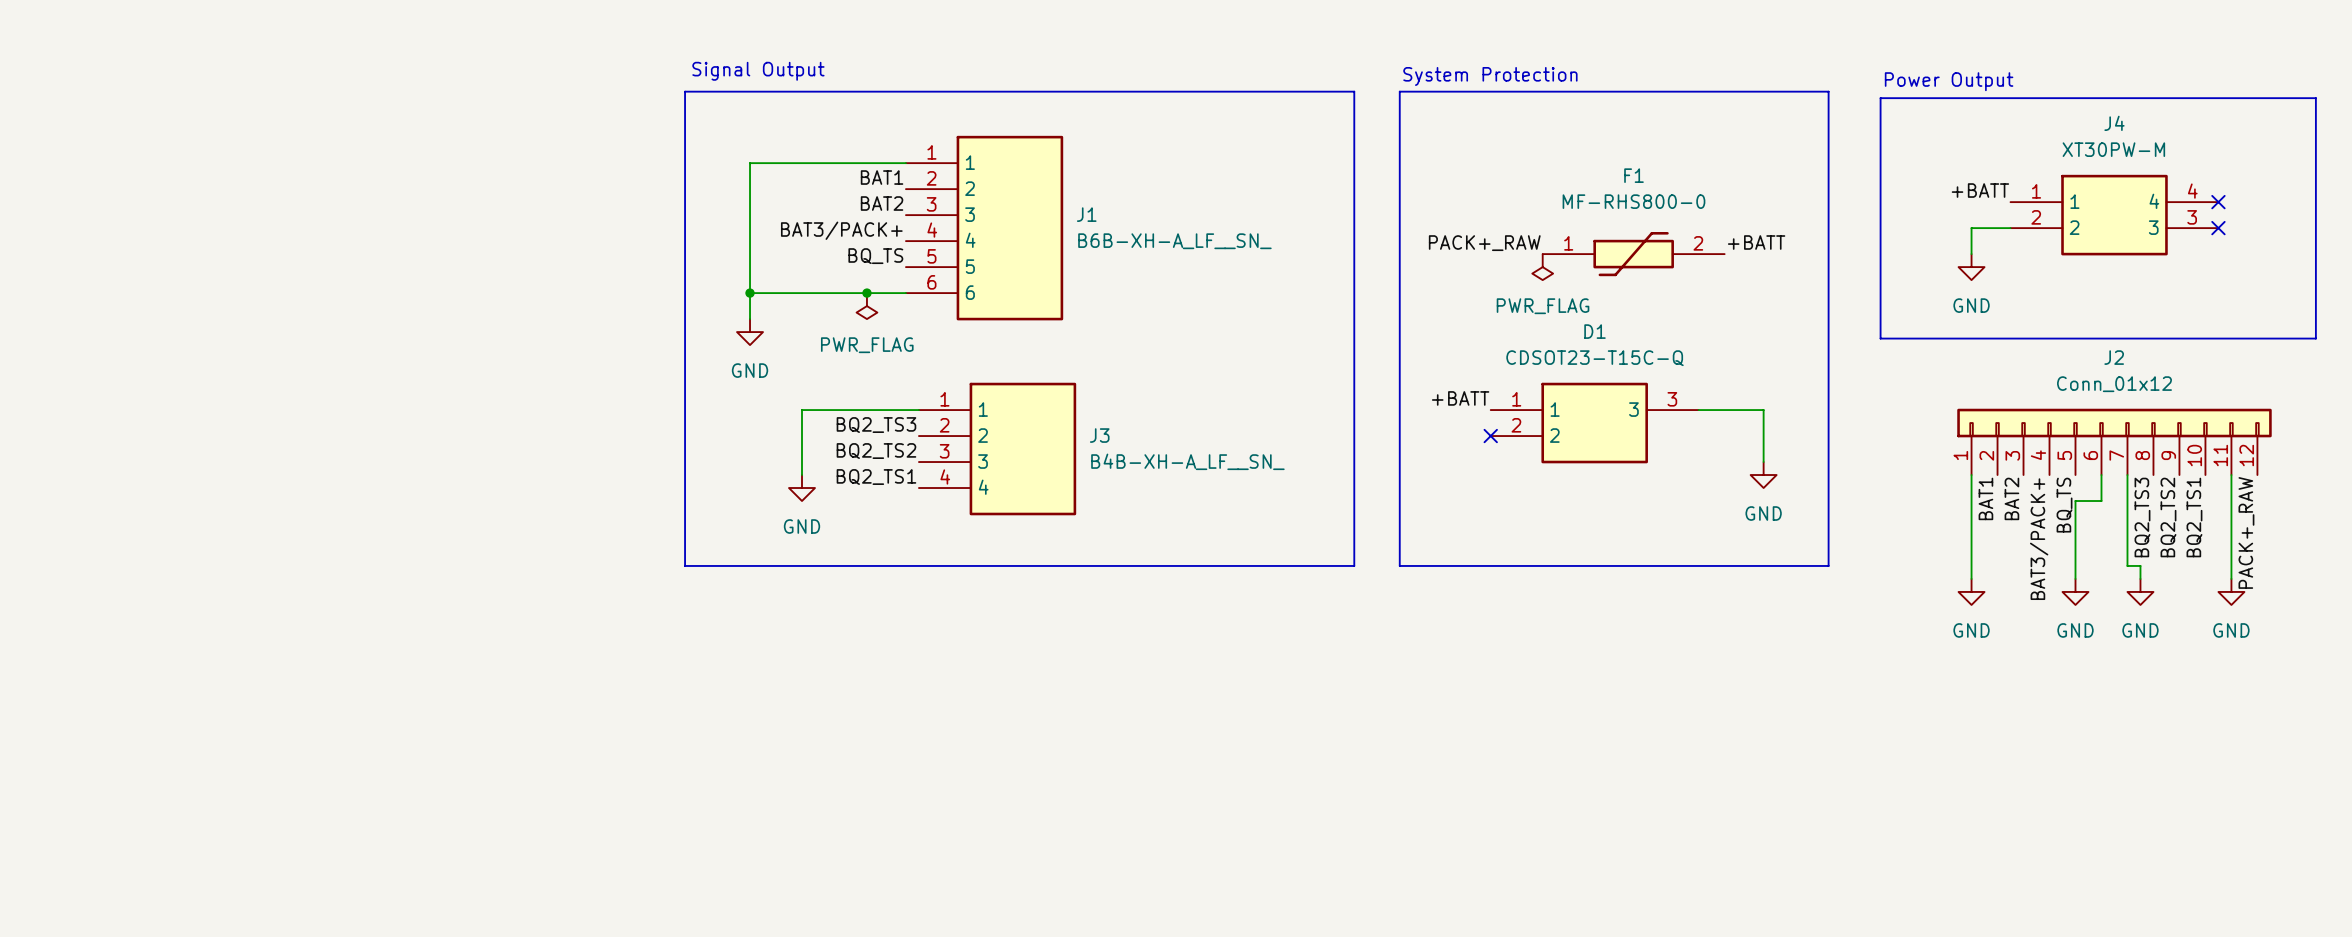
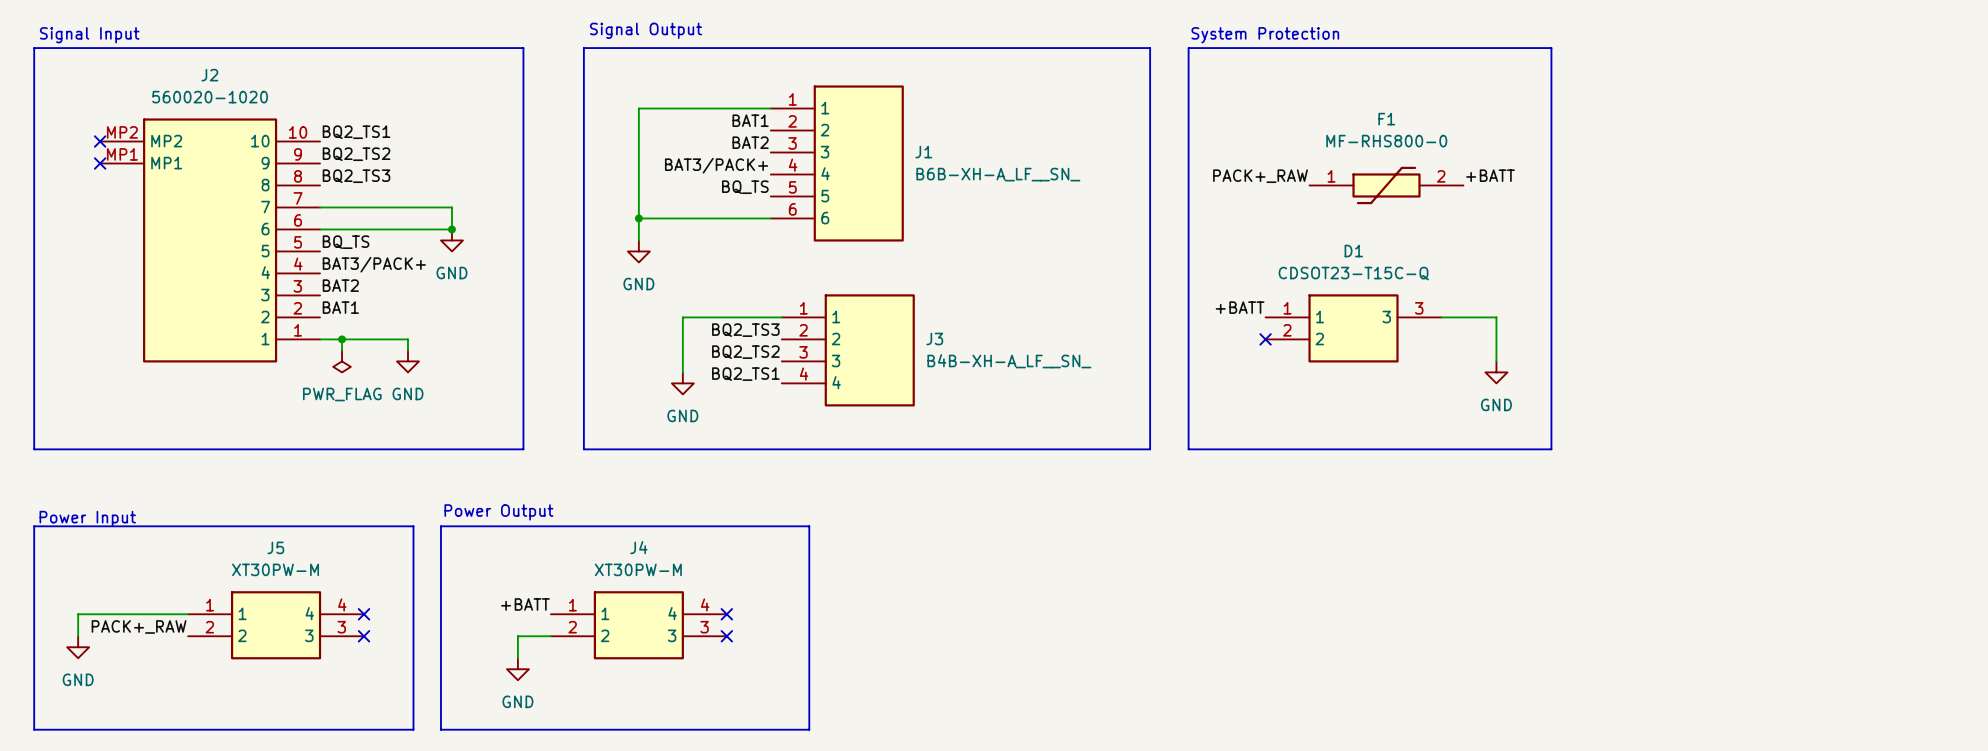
text: none -> Signal Input (89, 35)
text: Power Output (1949, 81) -> none
line: none -> (34, 48) (34, 449) (523, 449) (523, 48) (34, 48)
line: (1880, 98) (2315, 98) (2315, 338) (1880, 338) (1880, 98) -> none
label: +BATT (1980, 190) -> none
label: none -> BQ2_TS1 (356, 132)
no-connect mark: none -> (100, 141)
no-connect mark: (2218, 202) -> none
J4 position: (2114, 215) -> (638, 625)
label: none -> BQ2_TS2 (356, 154)
no-connect mark: none -> (100, 163)
wire: (2010, 228) (1971, 228) (1971, 254) -> none
no-connect mark: (2218, 228) -> none
label: none -> BQ2_TS3 (356, 176)
power symbol: PWR_FLAG (1542, 267) -> none
power symbol: GND (1971, 267) -> none
wire: none -> (320, 207) (451, 207) (451, 229) (320, 229)
junction: (866, 293) -> none
junction: none -> (451, 229)
power symbol: PWR_FLAG (866, 306) -> none
power symbol: none -> GND (451, 240)
label: none -> BQ_TS (346, 242)
label: none -> BAT3/PACK+ (374, 264)
J2 name position: J2 (2114, 357) -> J2 (209, 75)
label: none -> BAT2 (340, 285)
J2 value: Conn_01x12 (2114, 384) -> 560020-1020 (210, 97)
label: none -> BAT1 (340, 307)
J2 symbol: [1957, 408, 2272, 476] -> [100, 118, 321, 363]
wire: none -> (320, 339) (407, 339) (407, 350)
wire: none -> (342, 339) (342, 350)
junction: none -> (342, 339)
power symbol: none -> PWR_FLAG (342, 361)
power symbol: none -> GND (407, 361)
wire: (1971, 475) (1971, 578) -> none
wire: (2101, 475) (2101, 501) (2075, 501) (2075, 578) -> none
wire: (2127, 475) (2127, 565) (2140, 565) (2140, 578) -> none
wire: (2231, 475) (2231, 578) -> none
label: BAT1 (1985, 498) -> none
label: BAT2 (2011, 498) -> none
label: BQ_TS (2064, 505) -> none
label: BQ2_TS3 (2142, 517) -> none
label: BQ2_TS2 (2168, 517) -> none
label: BQ2_TS1 (2194, 517) -> none
label: PACK+_RAW (2246, 532) -> none
label: BAT3/PACK+ (2039, 539) -> none
power symbol: GND (1971, 591) -> none
power symbol: GND (2075, 591) -> none
power symbol: GND (2140, 591) -> none
power symbol: GND (2231, 591) -> none
text: none -> Power Output (498, 512)
text: none -> Power Input (87, 518)
line: none -> (34, 526) (413, 526) (413, 729) (34, 729) (34, 526)
line: none -> (440, 526) (809, 526) (809, 729) (440, 729) (440, 526)
label: none -> +BATT (525, 604)
wire: none -> (188, 614) (78, 614) (78, 636)
no-connect mark: none -> (364, 614)
no-connect mark: none -> (726, 614)
J5: none -> XT30PW-M (276, 625)
label: none -> PACK+_RAW (139, 626)
no-connect mark: none -> (364, 636)
wire: none -> (550, 636) (517, 636) (517, 658)
no-connect mark: none -> (726, 636)
power symbol: none -> GND (78, 647)
power symbol: none -> GND (517, 669)

